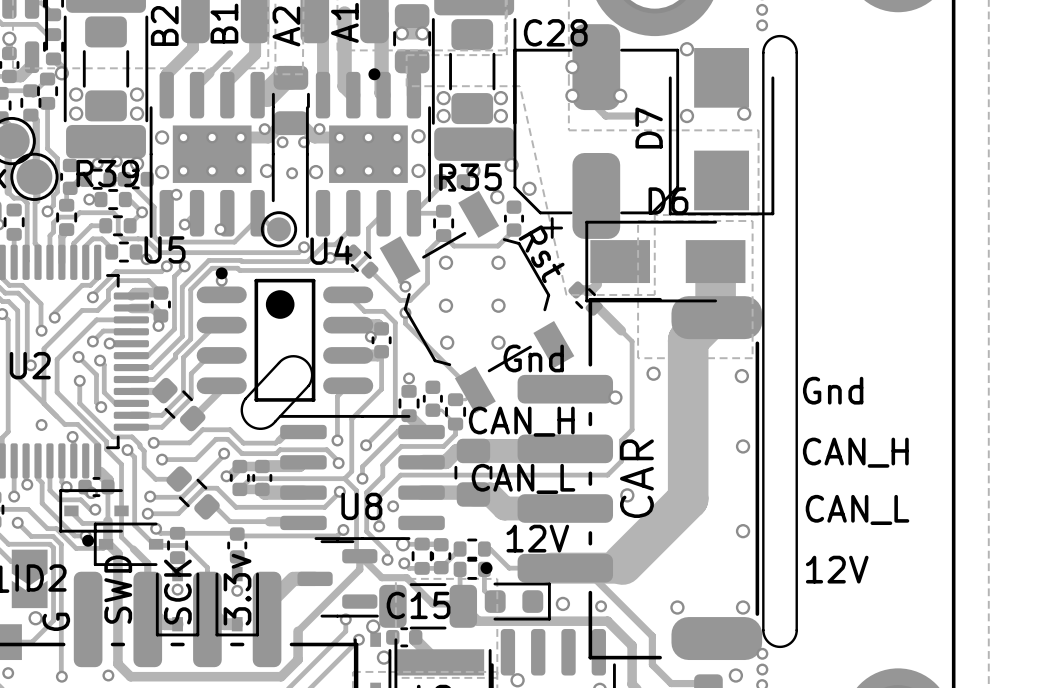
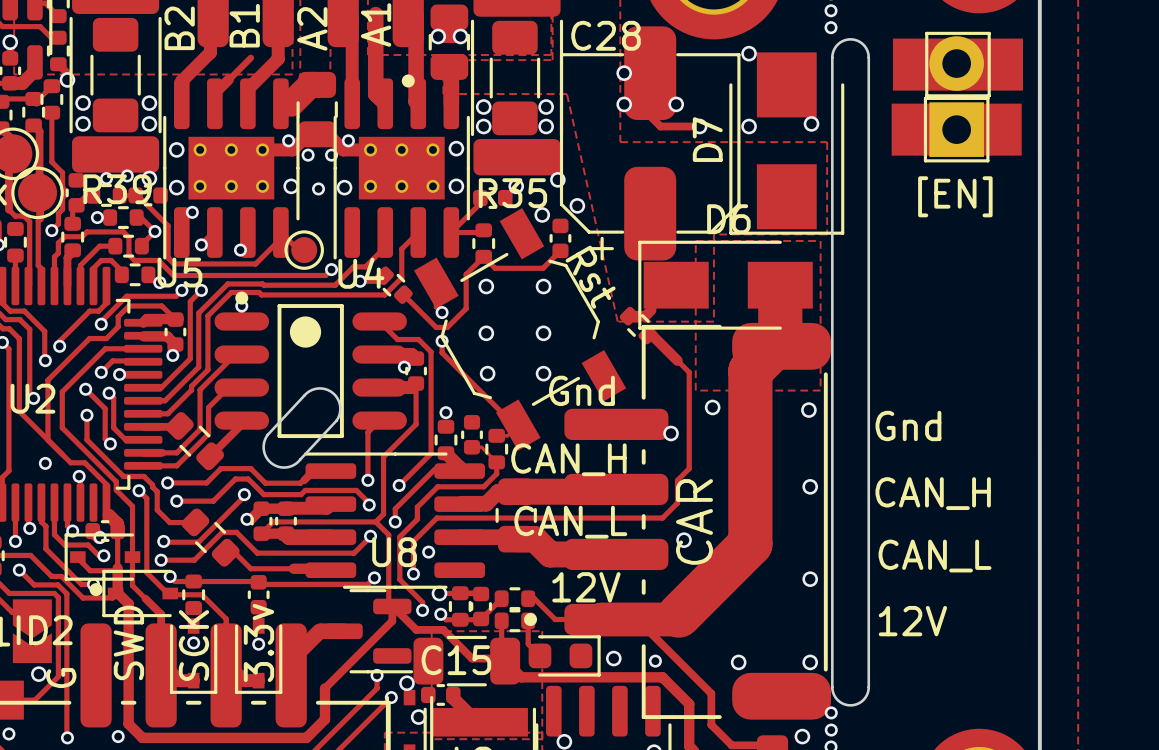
part: none -> (957, 64)
part: none -> (956, 96)
part: none -> (956, 129)

